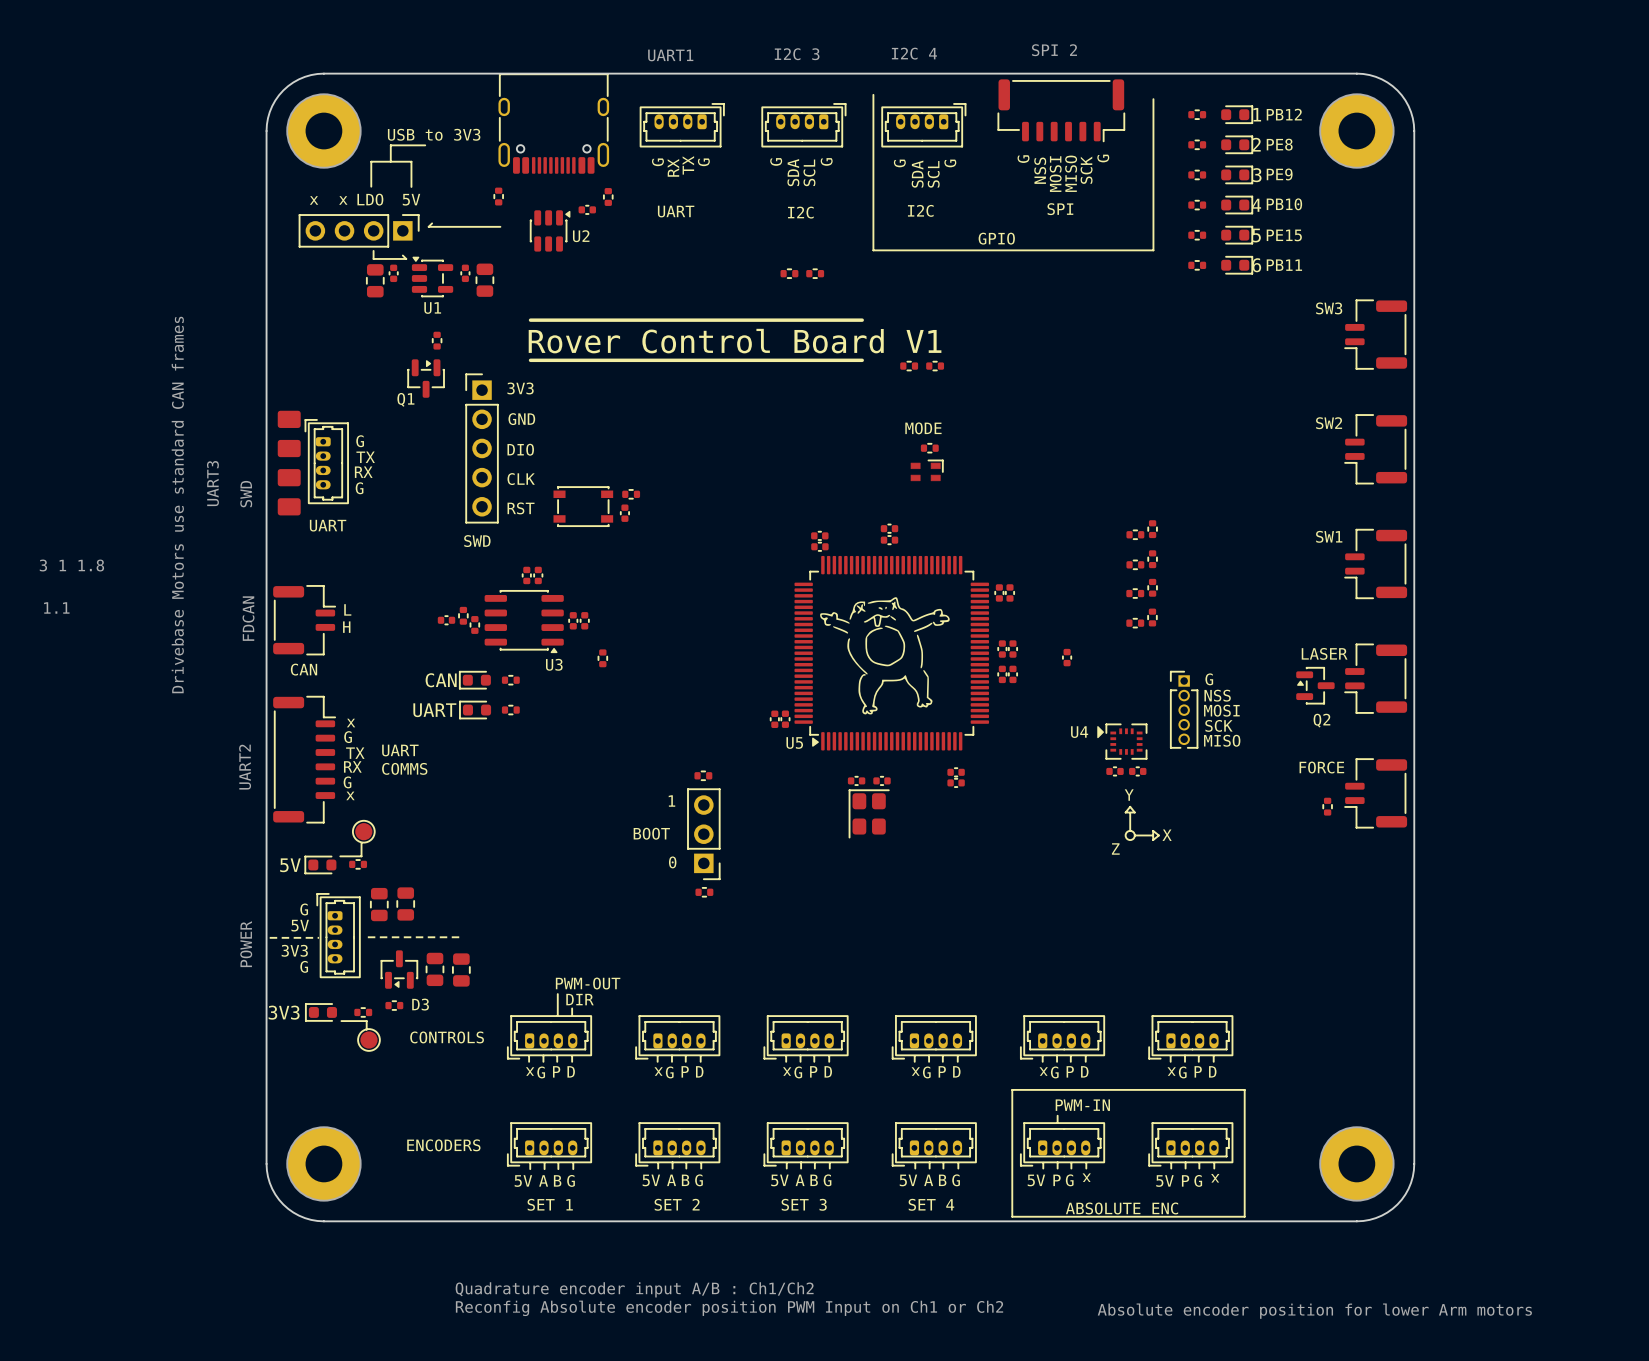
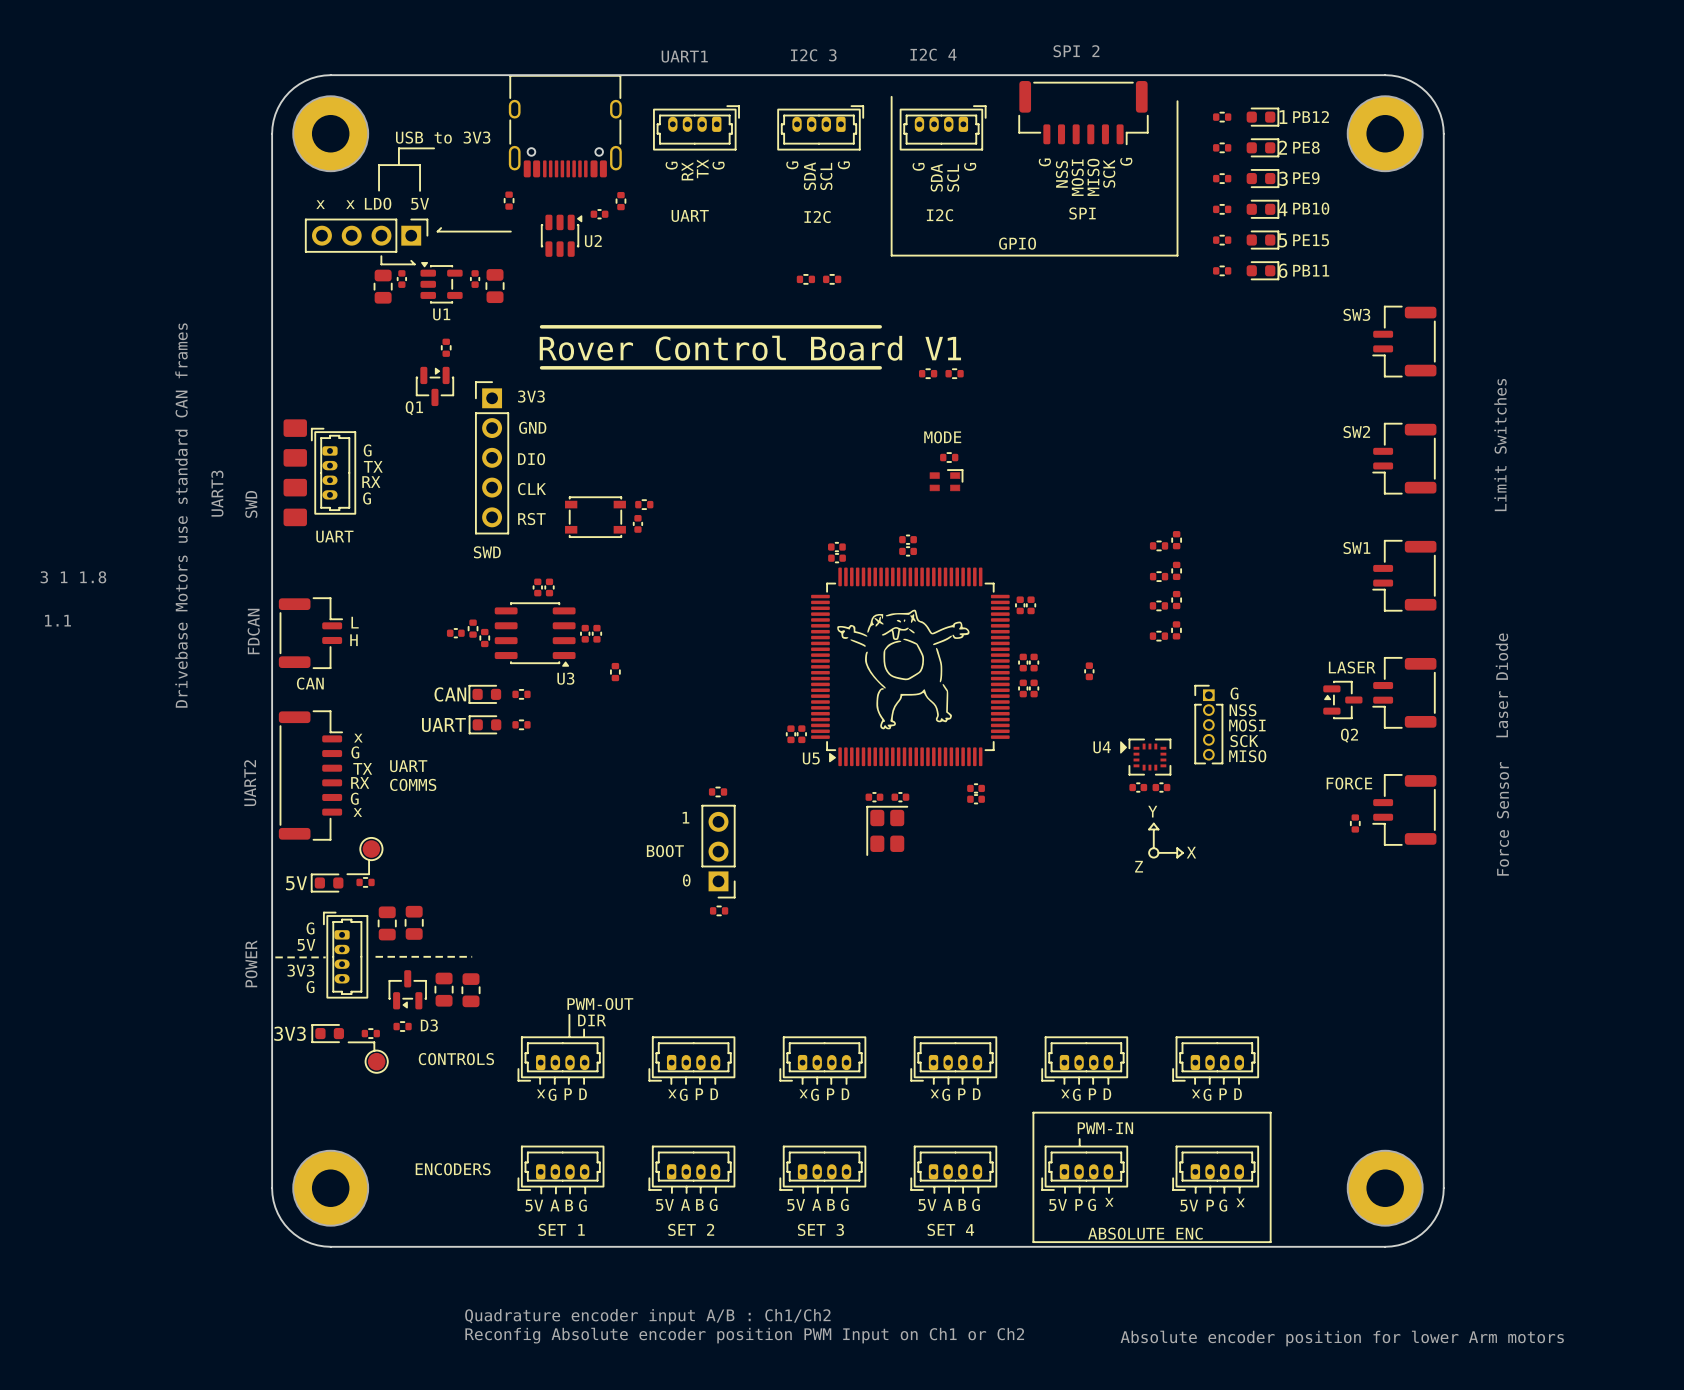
text: none -> Limit Switches (1500, 445)
text: none -> Laser Diode (1501, 685)
text: none -> Force Sensor (1502, 818)

